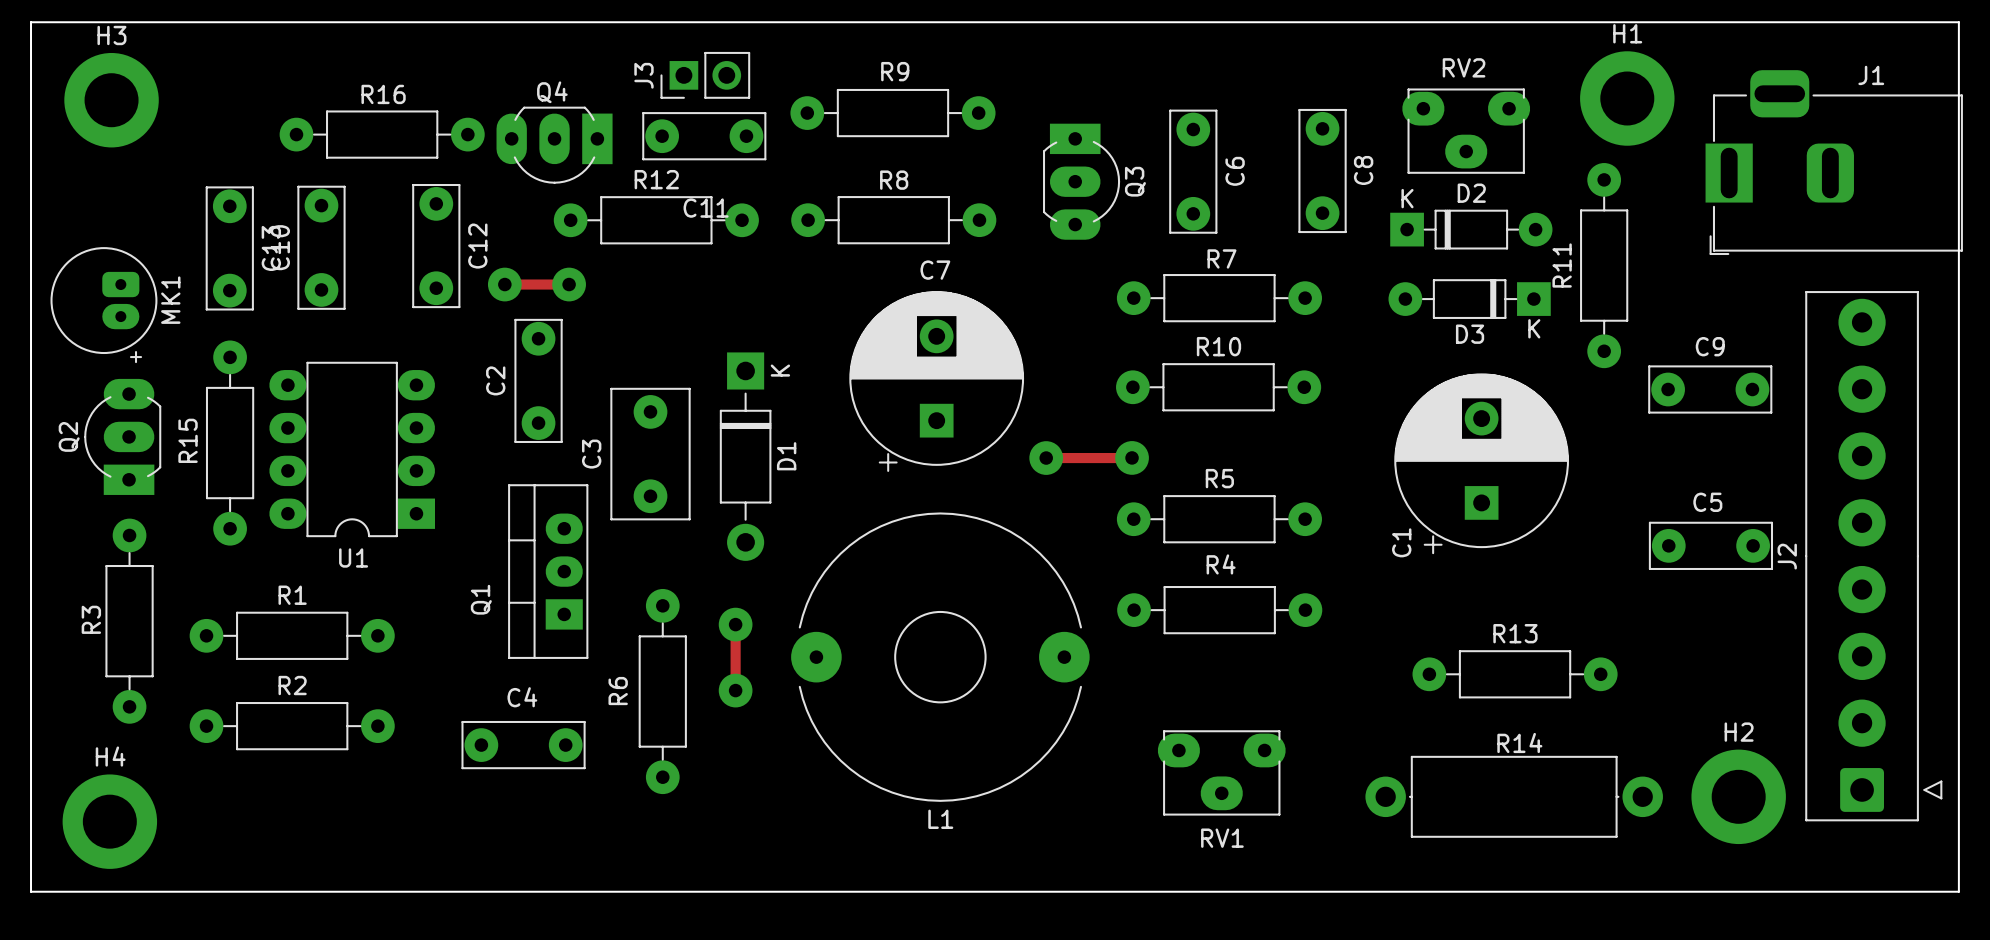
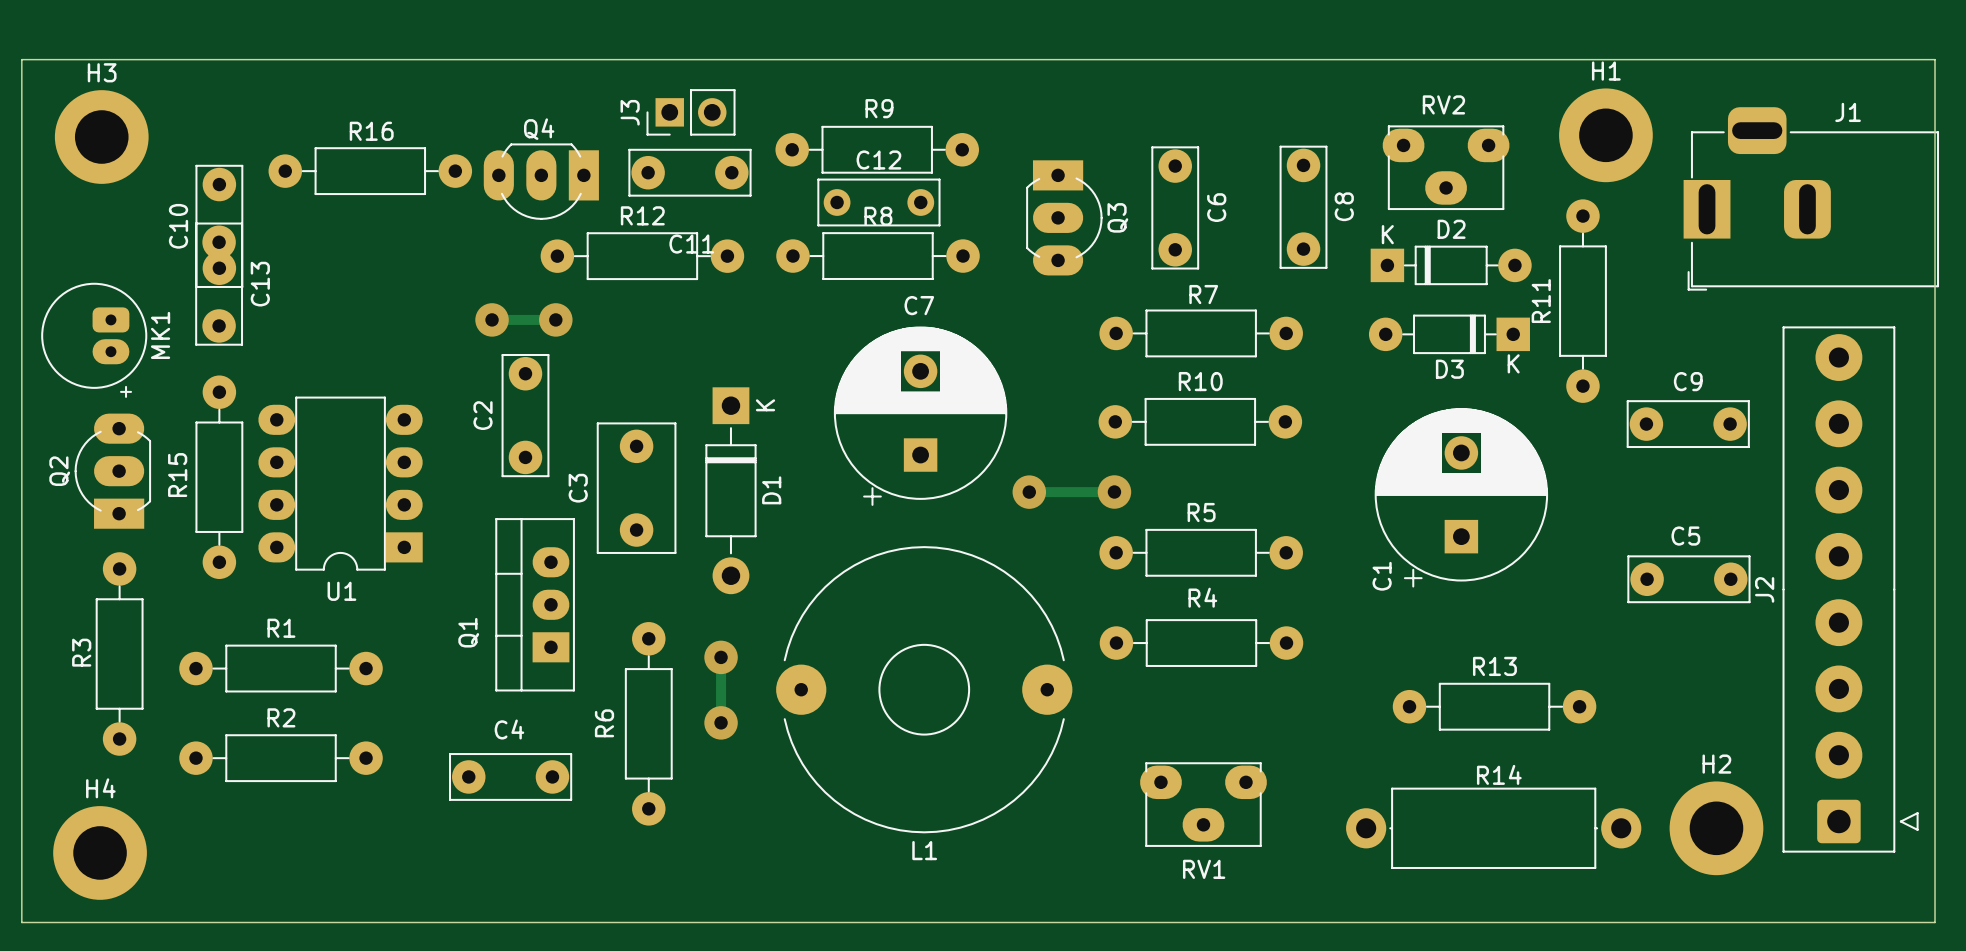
C12 footprint: [412, 183, 461, 309] -> [817, 178, 941, 227]
C12 name position: C12 (477, 246) -> C12 (878, 160)
C10 position: (321, 247) -> (219, 226)

